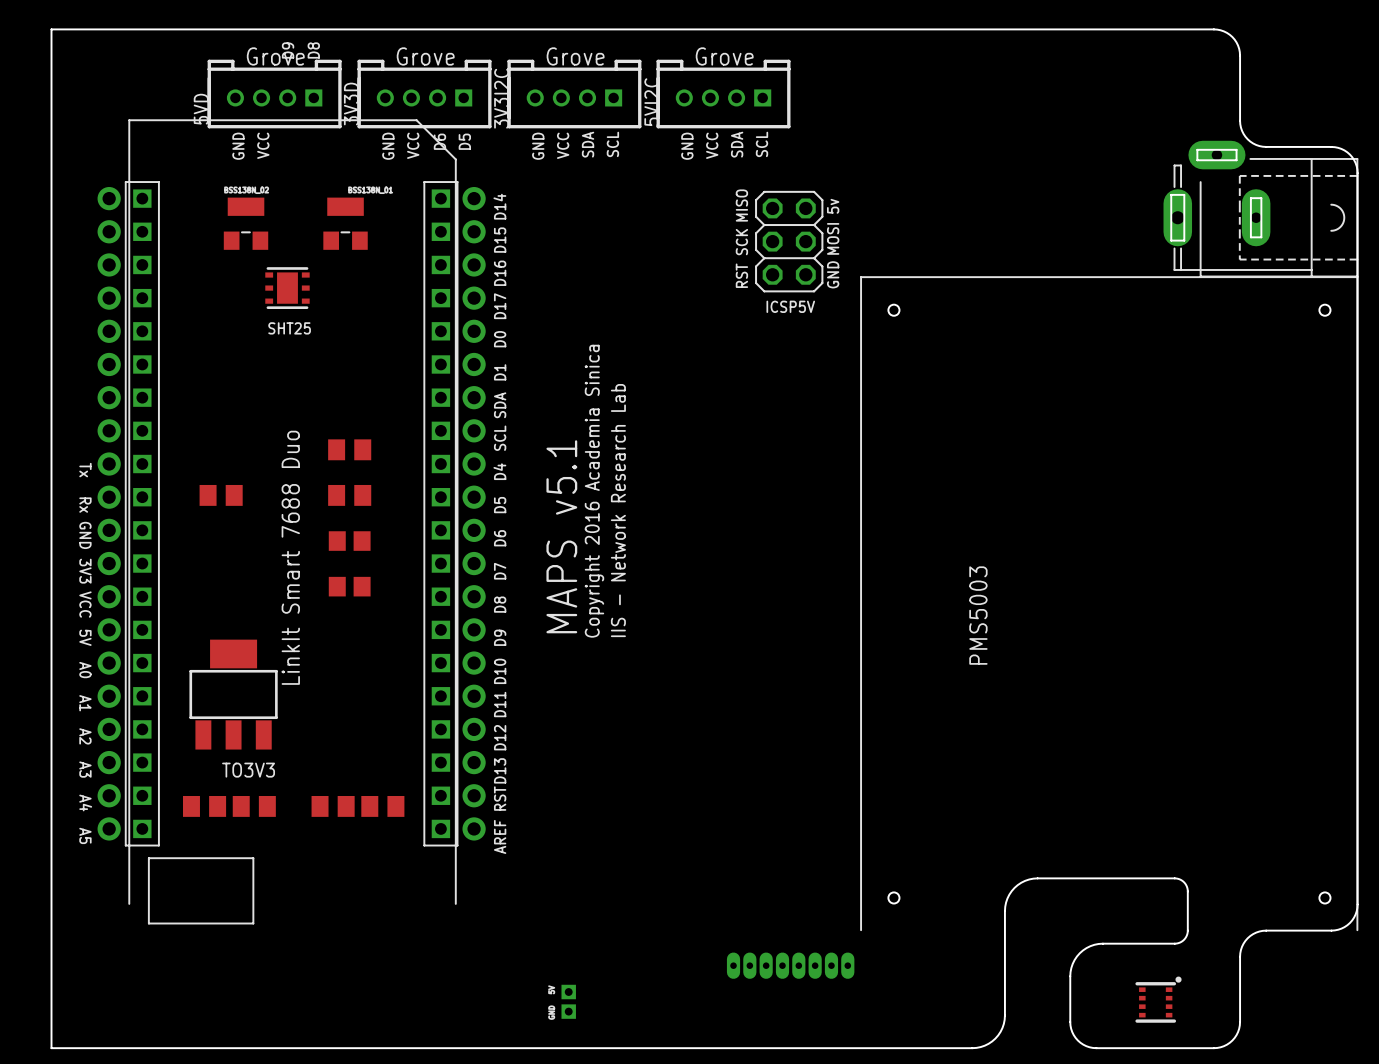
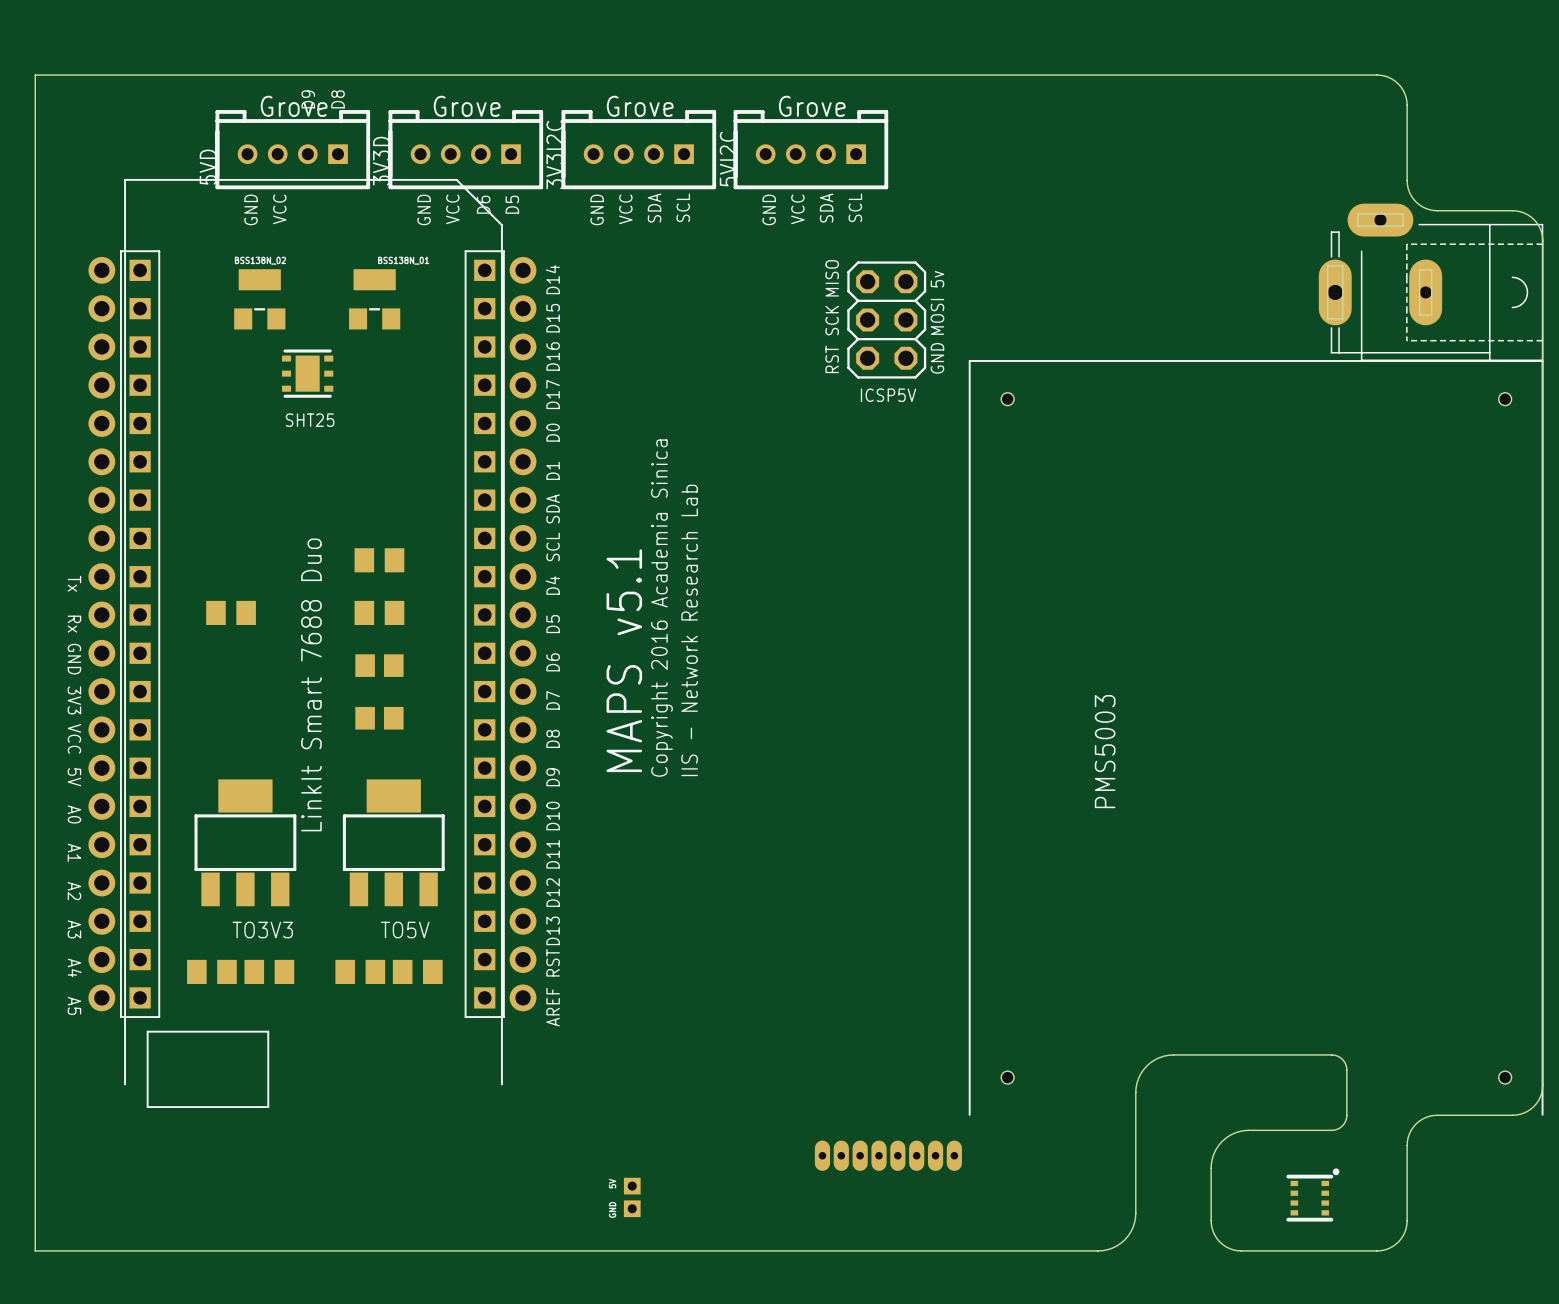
TO5V: none -> (393, 842)

